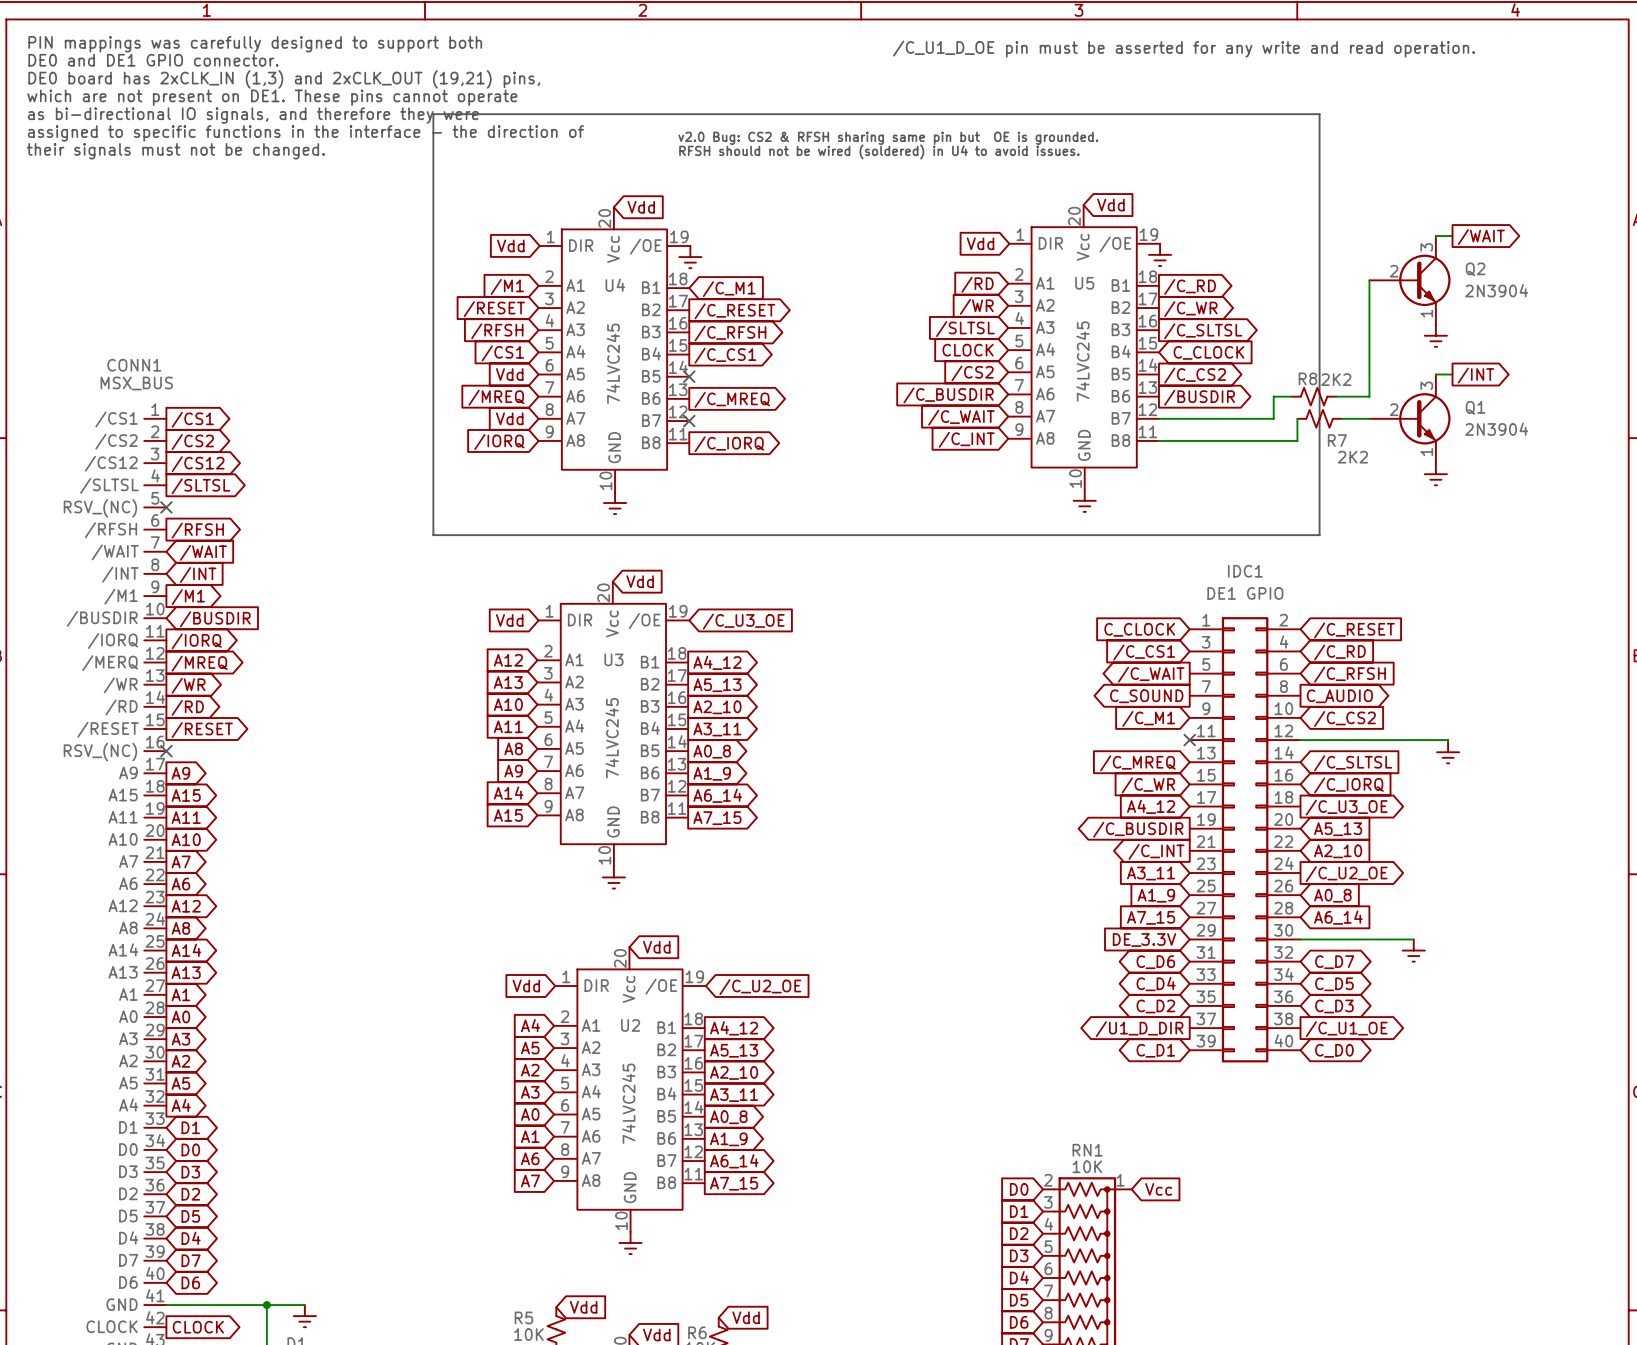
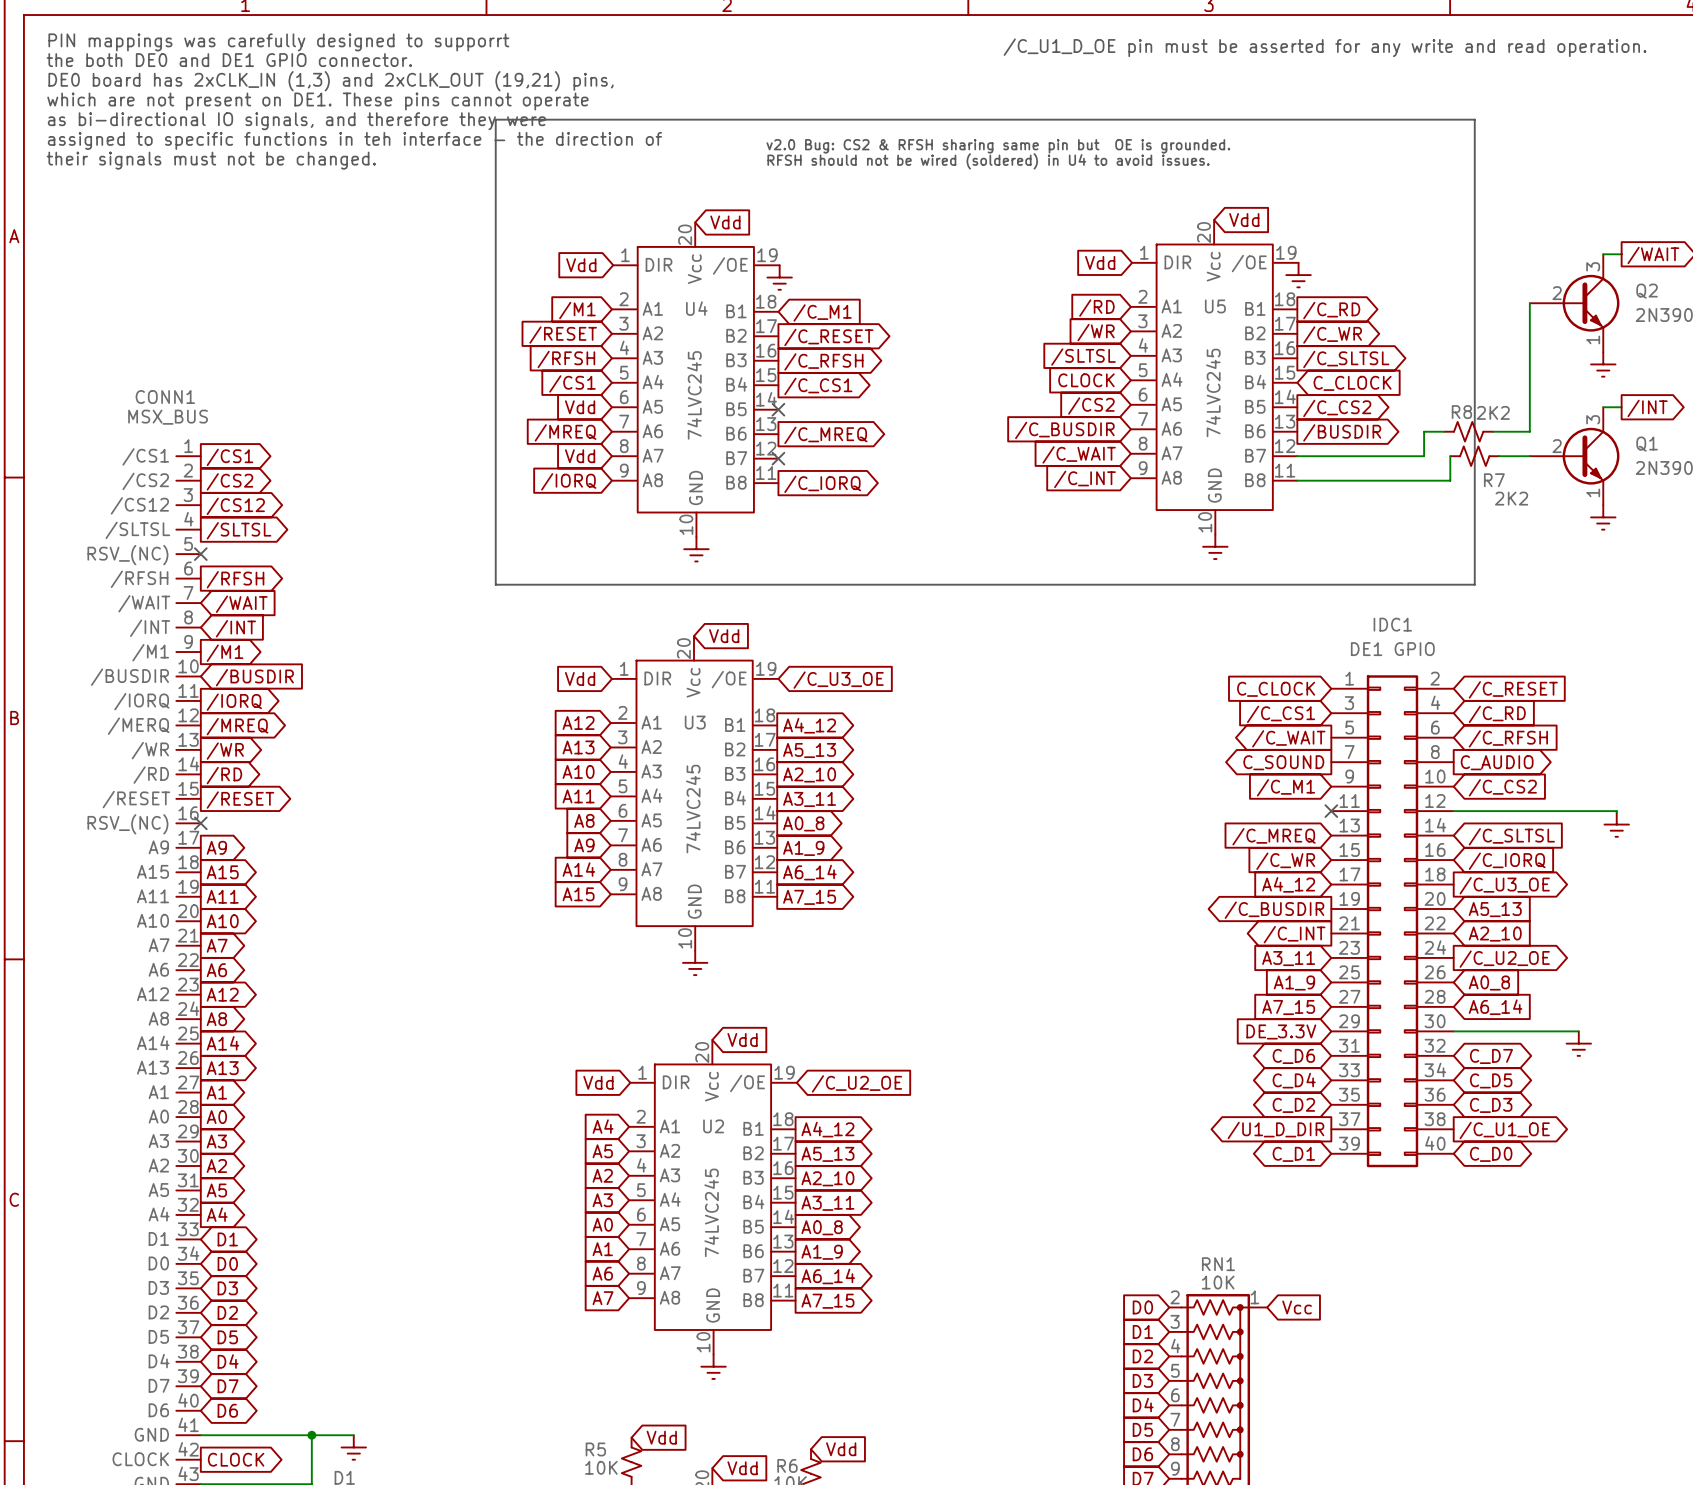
text: PIN mappings was carefully designed to support both (255, 44) -> PIN mappings was carefully designed to supporrt (278, 42)
text: DE0 and DE1 GPIO connector. (153, 60) -> the both DE0 and DE1 GPIO connector. (229, 60)
text: assigned to specific functions in the interface - the direction of (305, 133) -> assigned to specific functions in teh interface - the direction of (354, 140)

